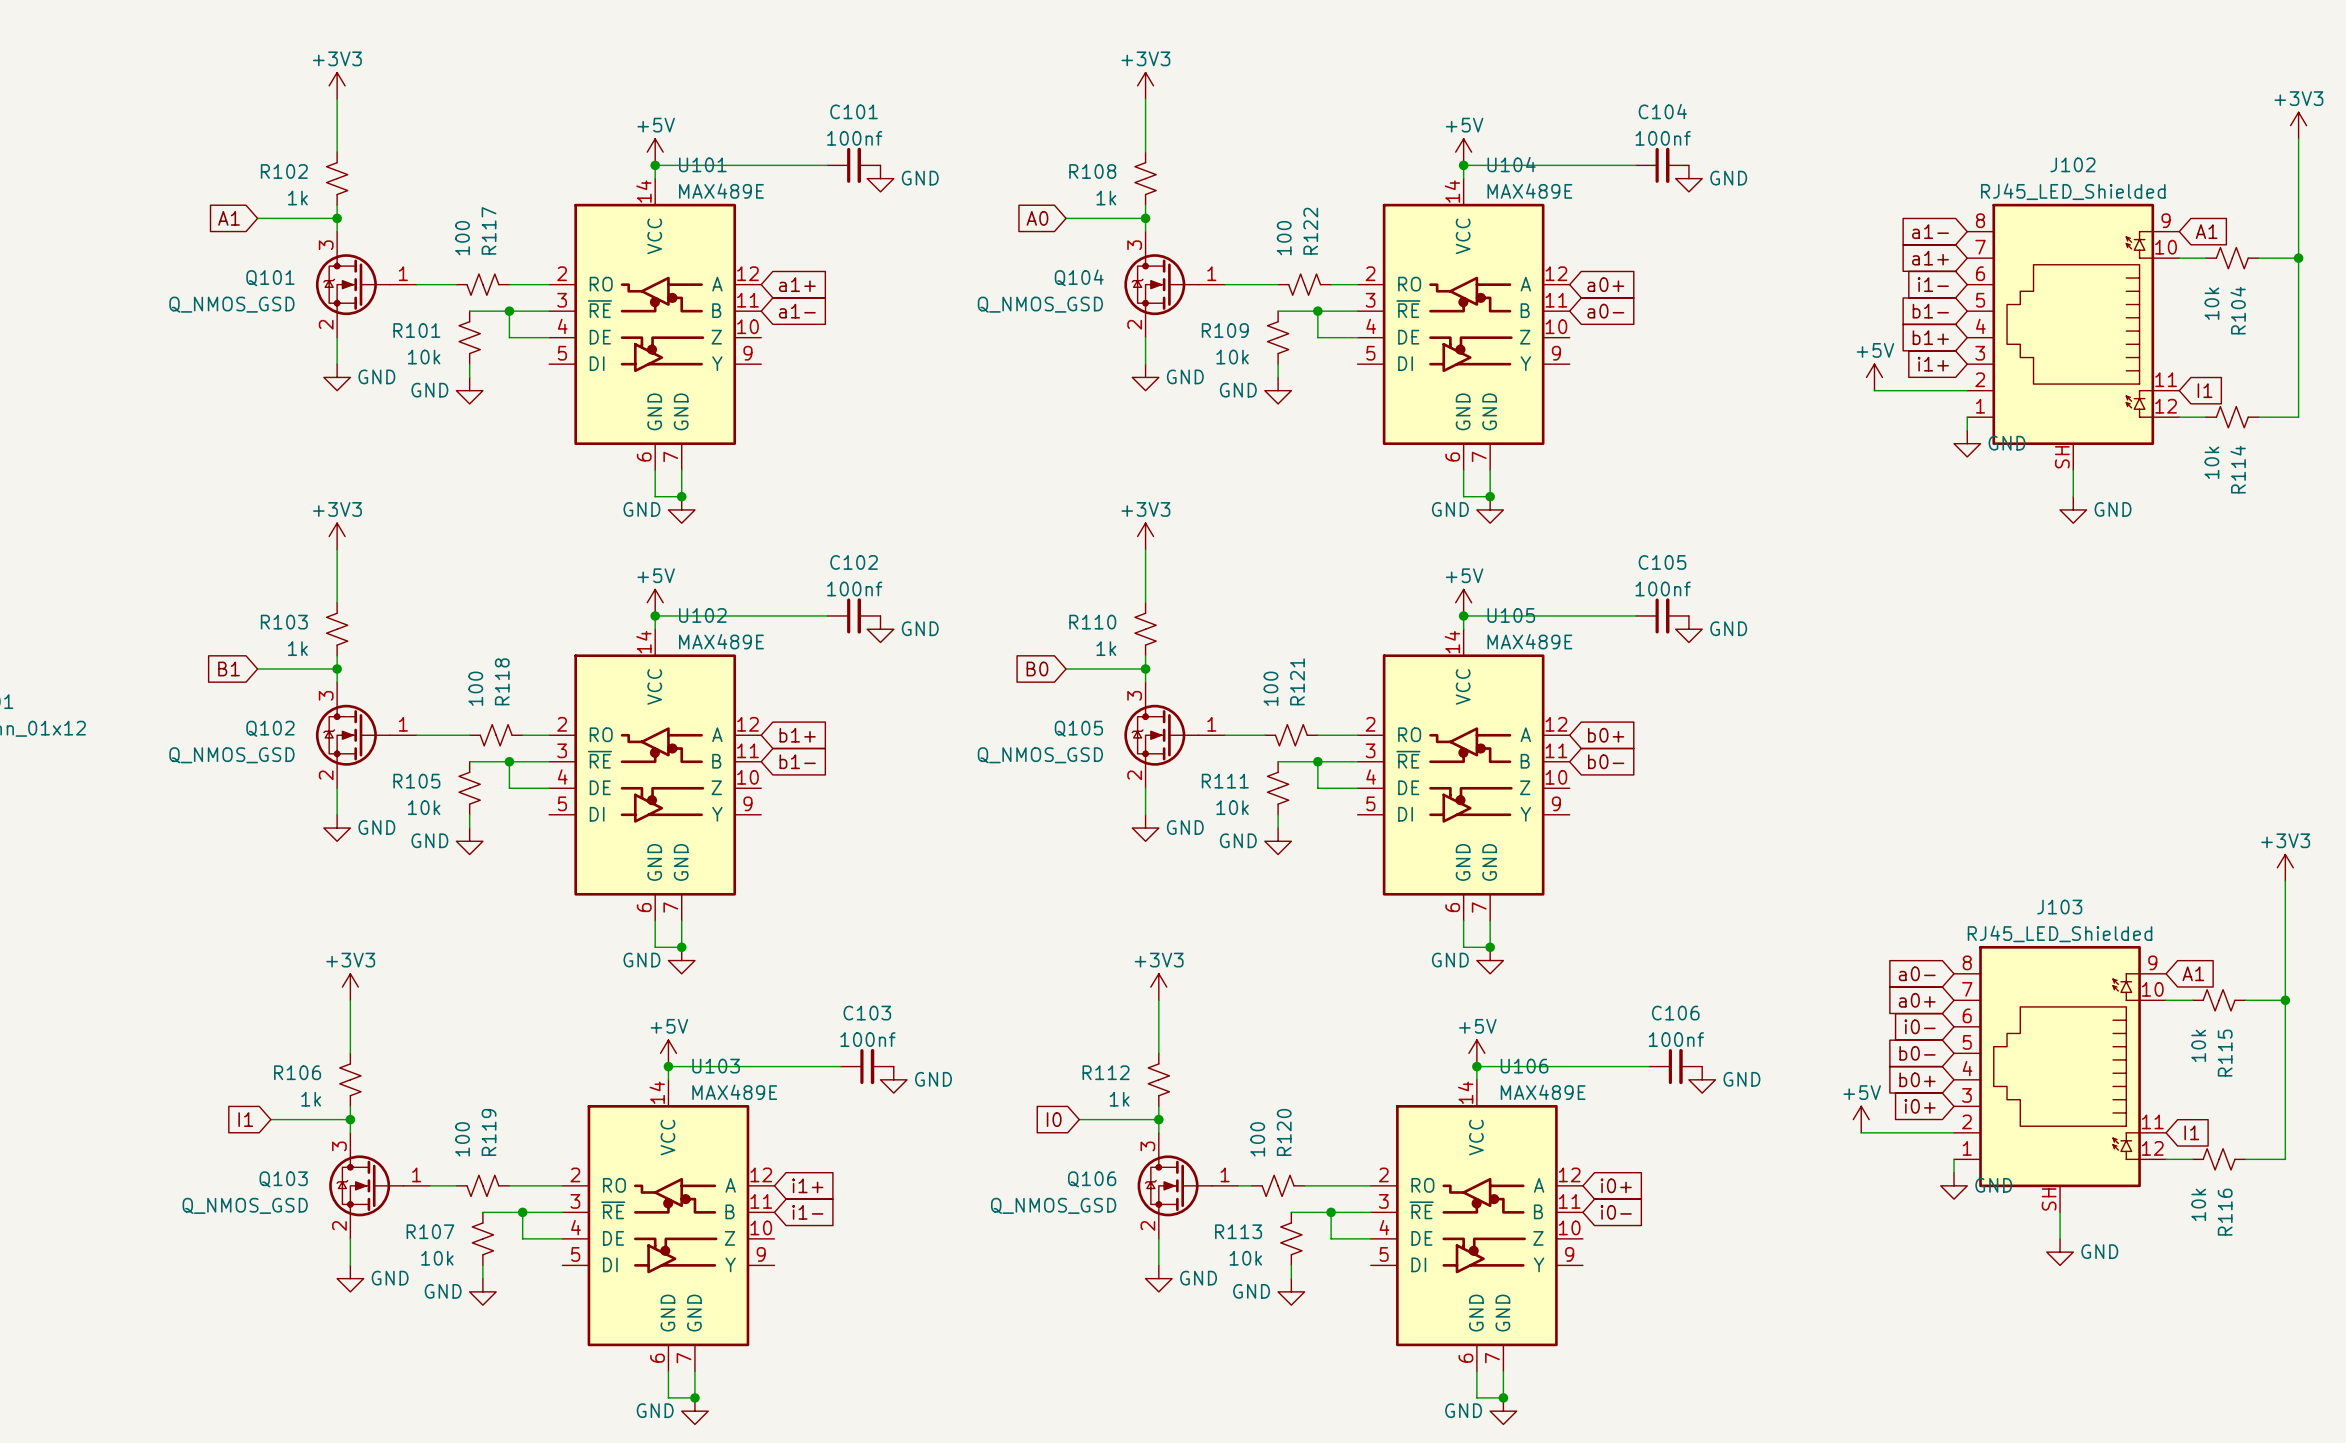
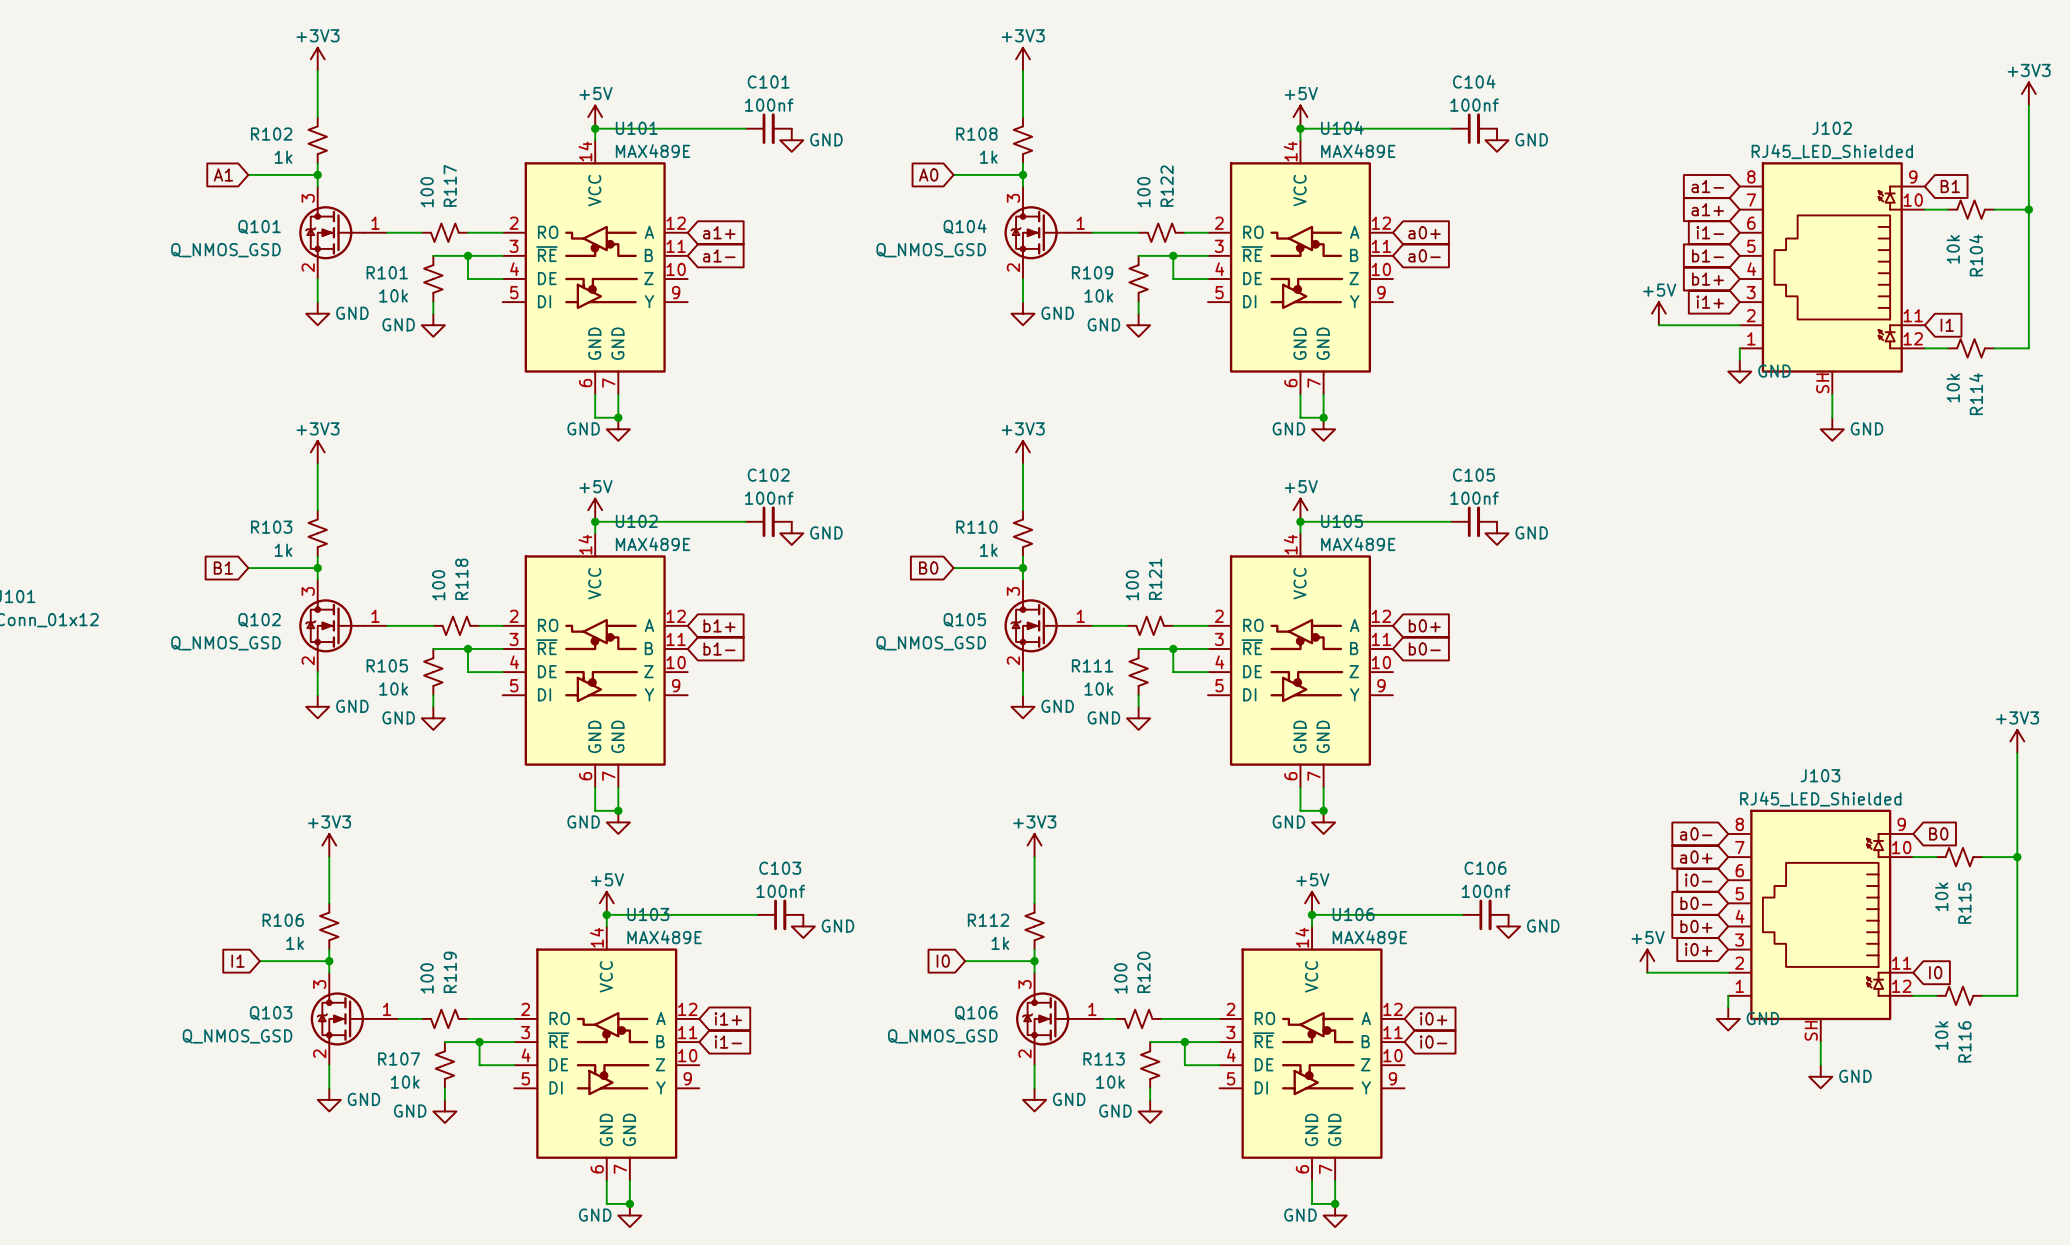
global label: A1 (2206, 231) -> B1 (1950, 186)
global label: A1 (2193, 973) -> B0 (1938, 833)
global label: I1 (2191, 1132) -> I0 (1935, 972)

